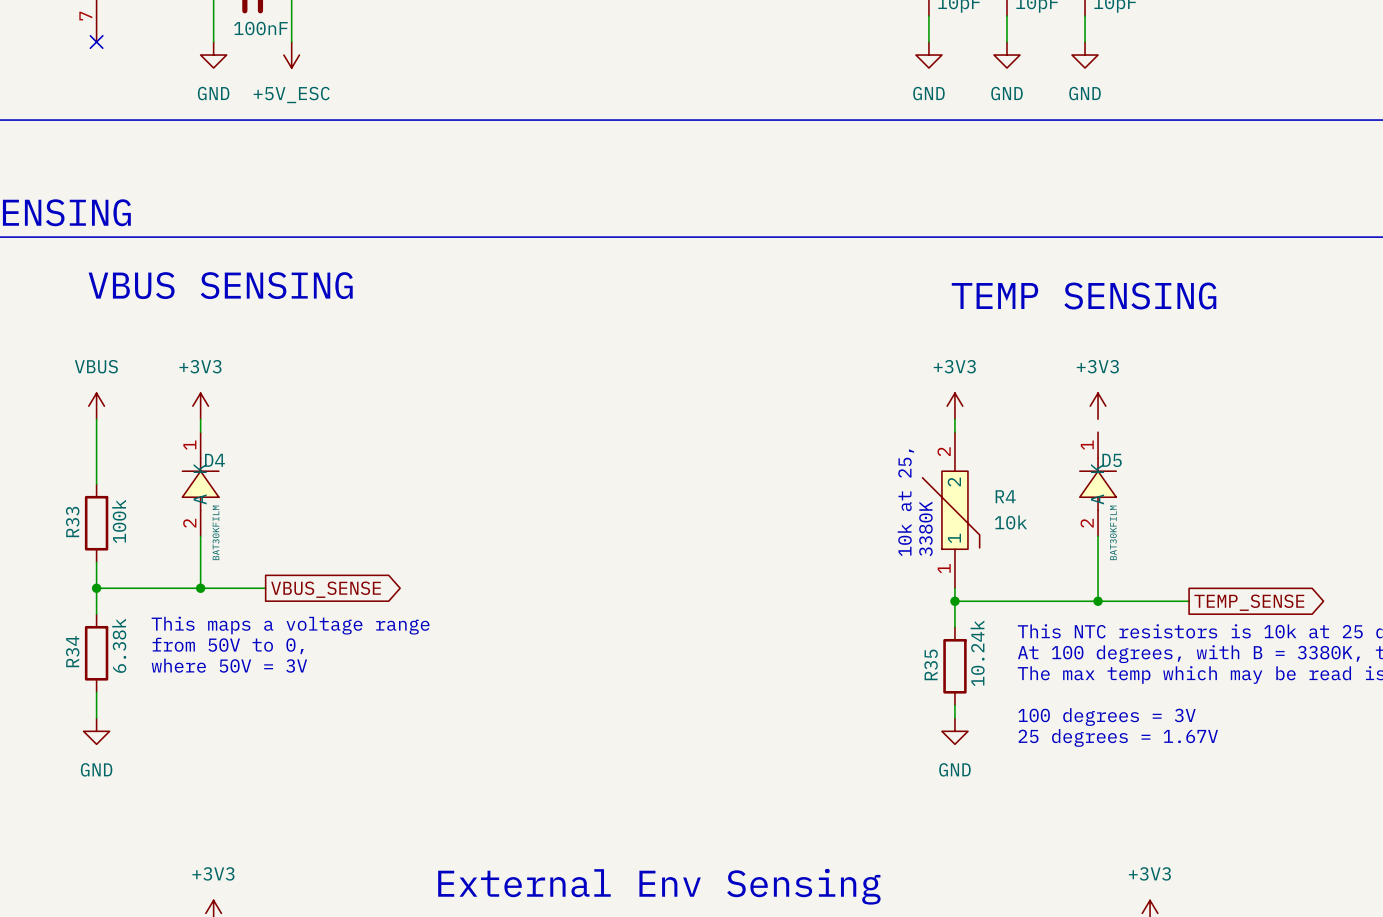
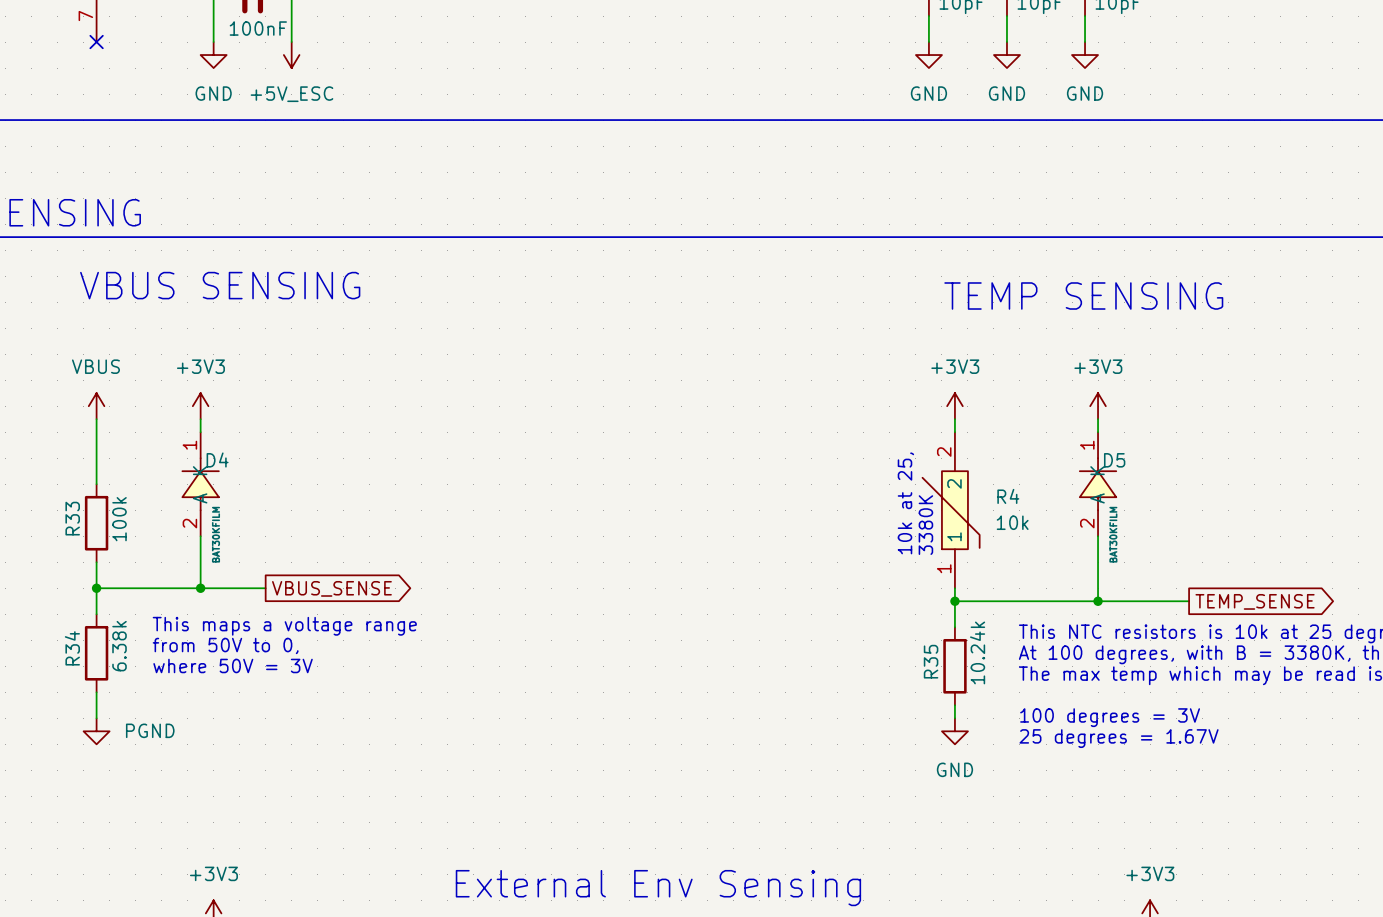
wire: none -> (1098, 419) (1098, 432)
power symbol: GND (96, 731) -> PGND (96, 731)

